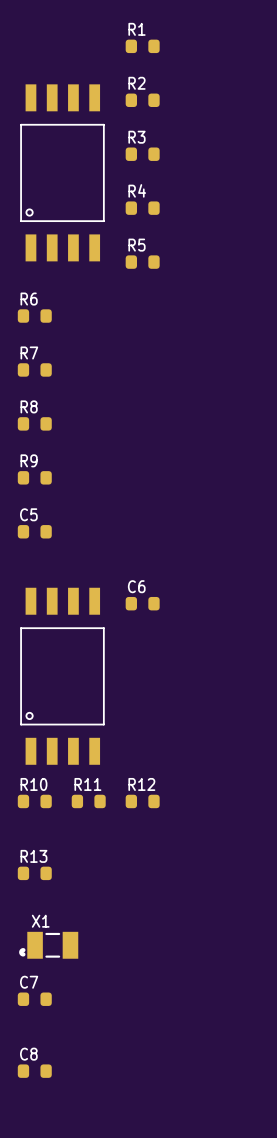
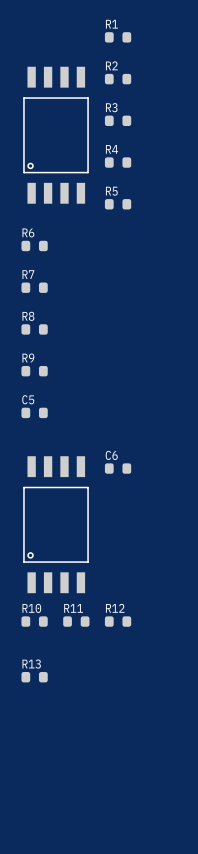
X1: (48, 945) -> none
C7: (34, 999) -> none
C8: (34, 1071) -> none

